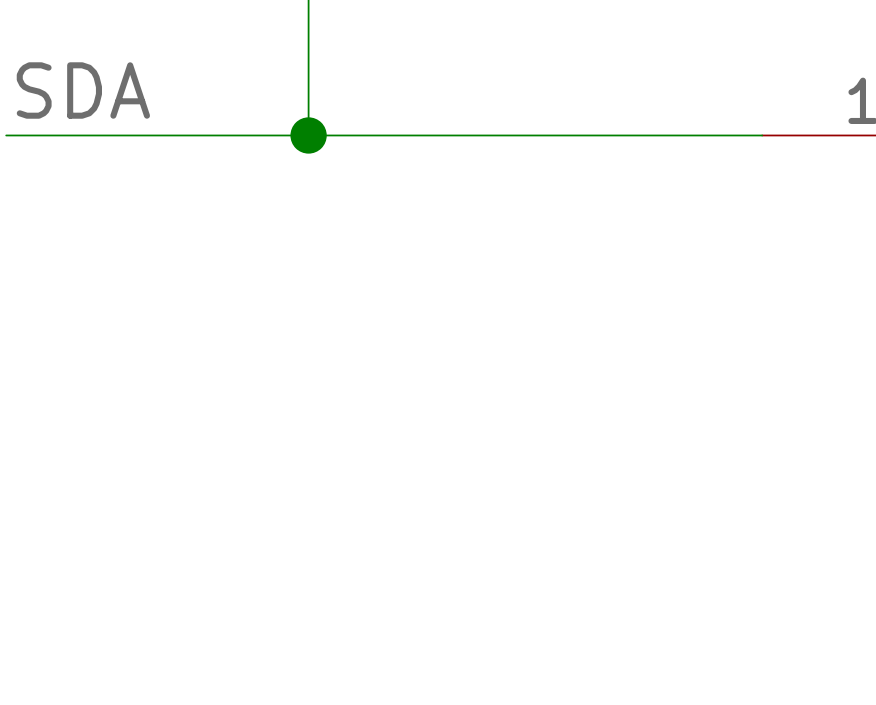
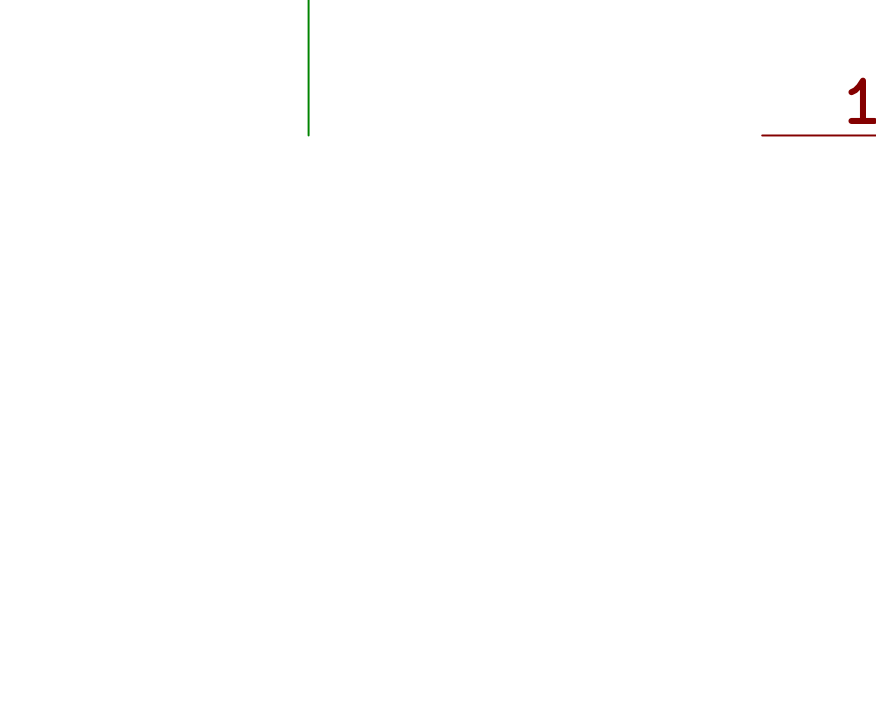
label: SDA (83, 90) -> none
wire: (6, 135) (762, 135) -> none
junction: (308, 135) -> none

